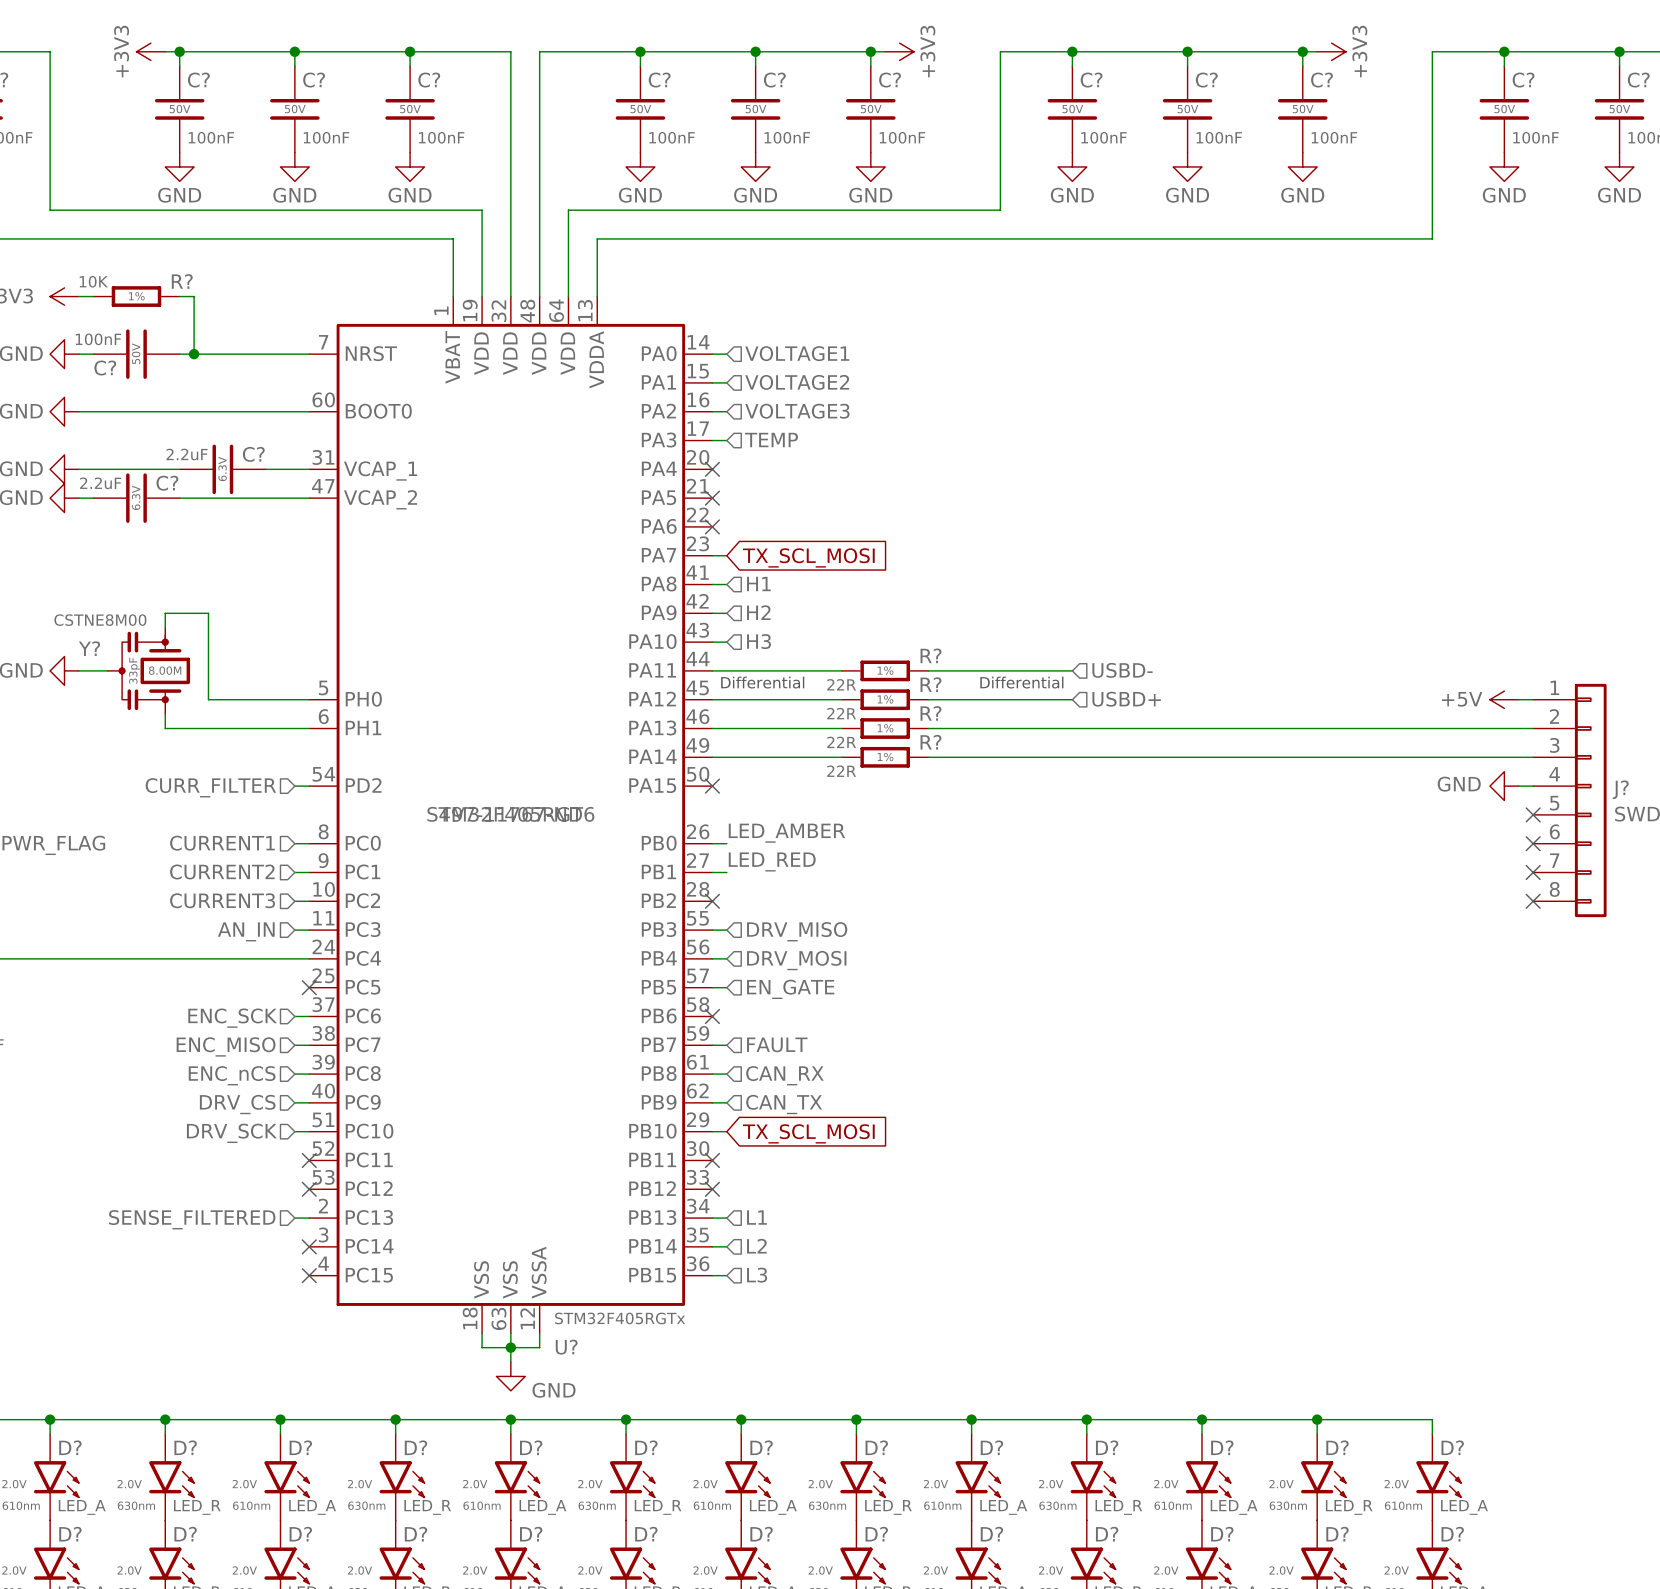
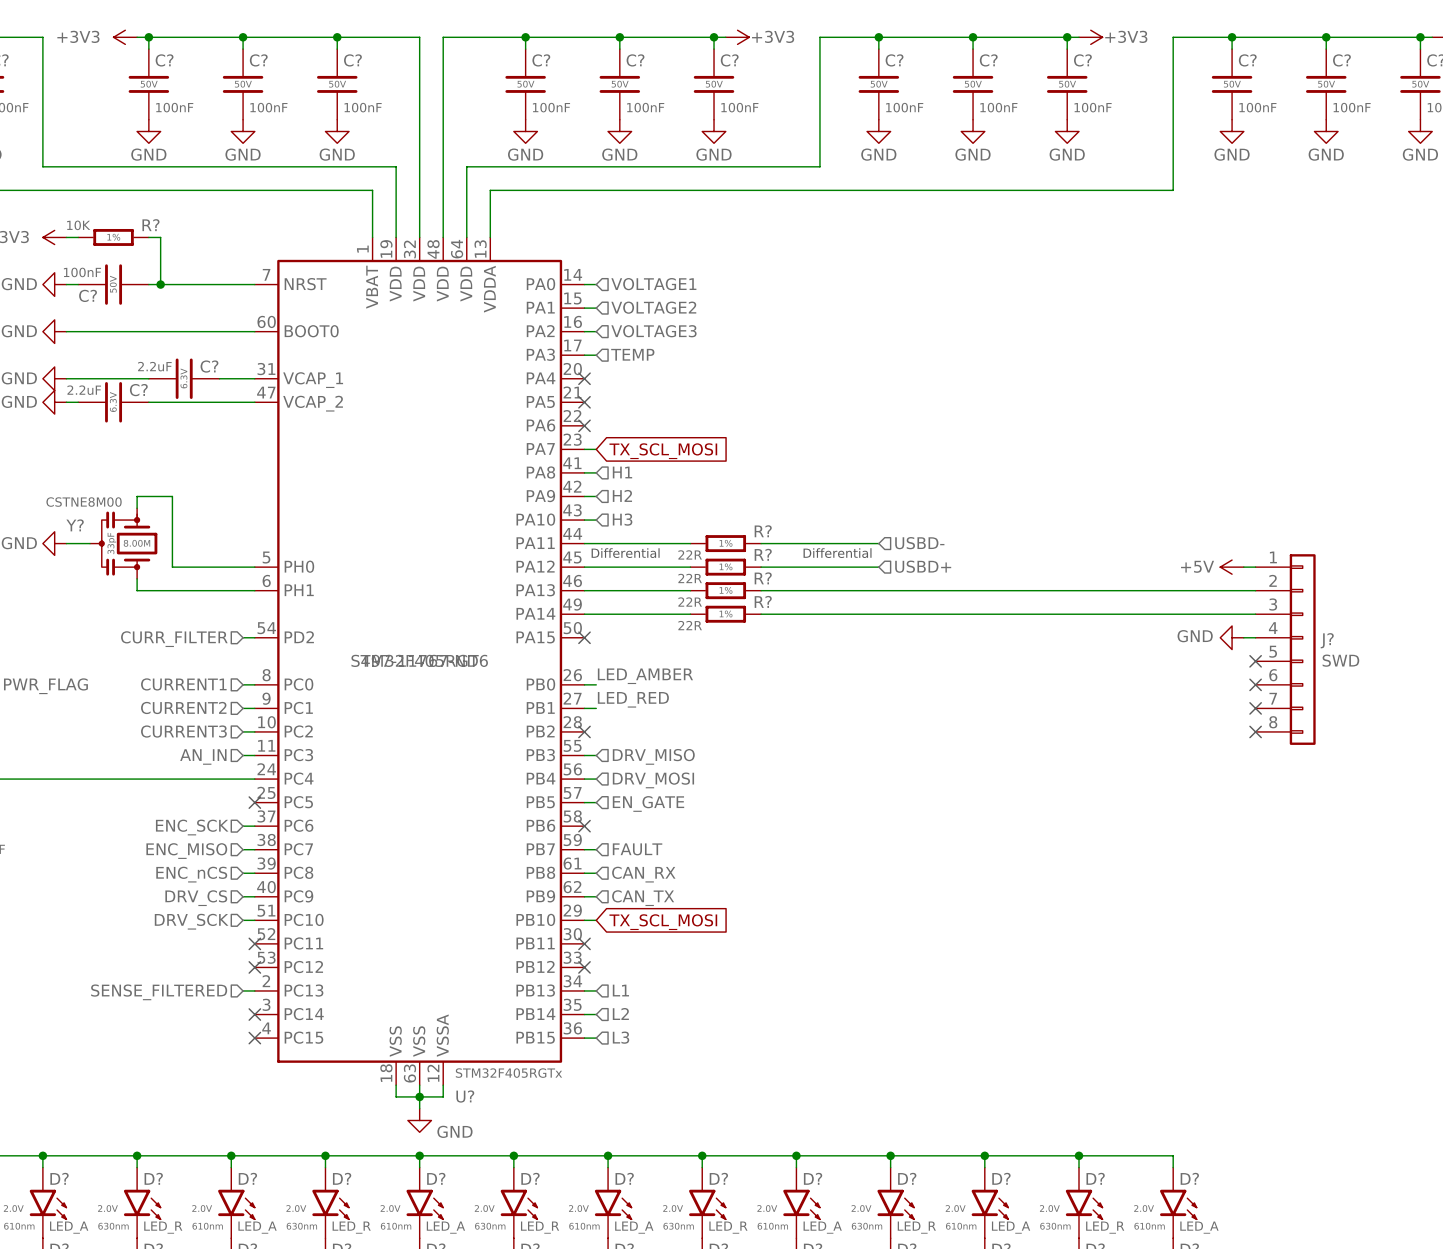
power symbol text rotation: 0° (121, 51) -> 90° clockwise (78, 36)
power symbol text rotation: 0° (927, 51) -> 90° clockwise (773, 36)
power symbol text rotation: 0° (1359, 51) -> 90° clockwise (1126, 36)

